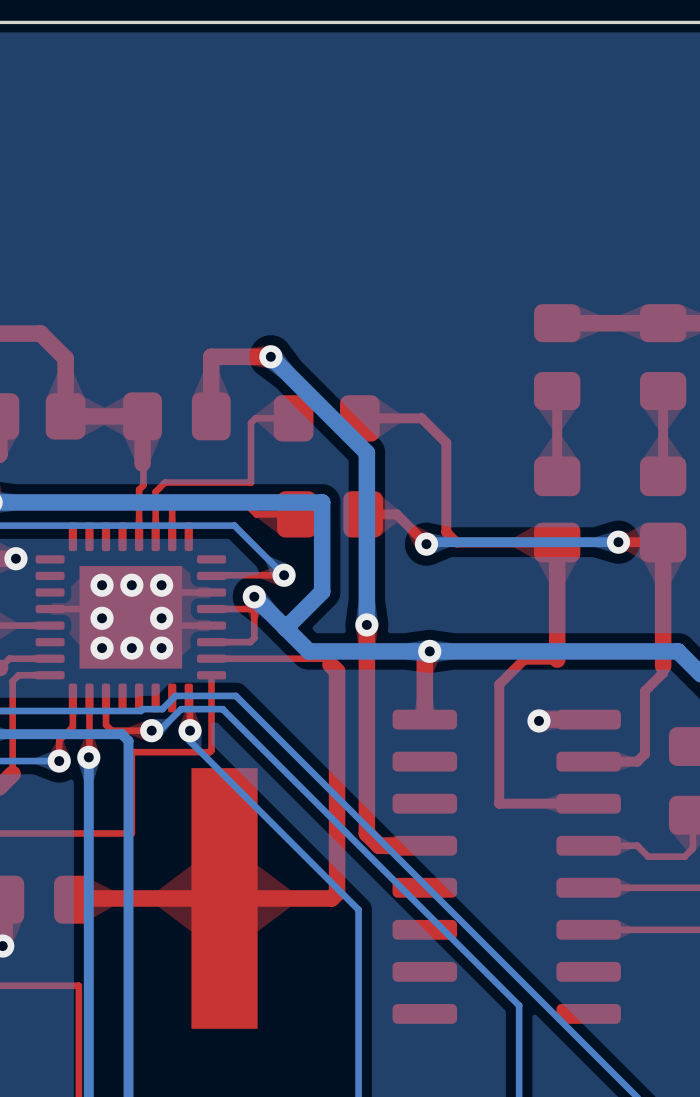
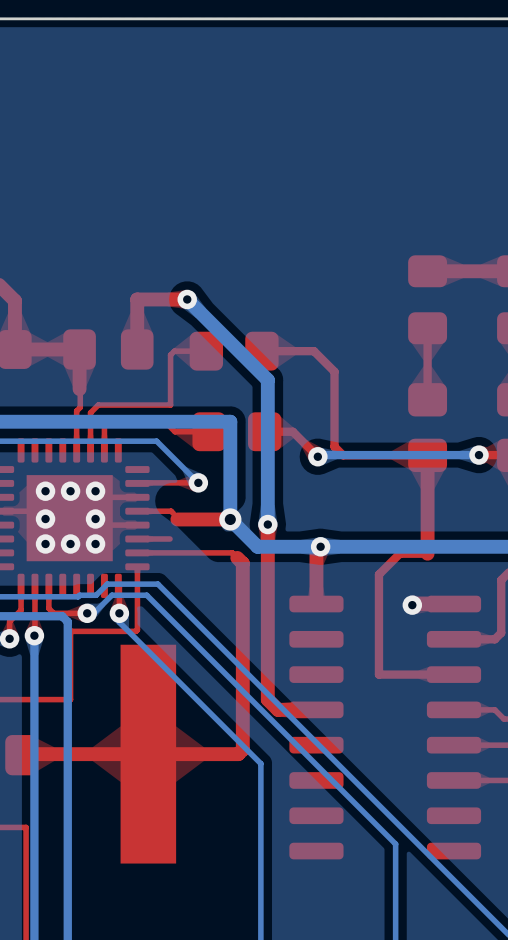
bottom track: (322, 591) (285, 628) -> none
top track: (254, 596) (254, 638) (250, 642) -> none
bottom track: (254, 596) (308, 651) (354, 651) -> (230, 496) (230, 519) (257, 546)
via: (254, 596) -> none
top track: none -> (230, 519) (177, 519)
via: none -> (230, 519)

